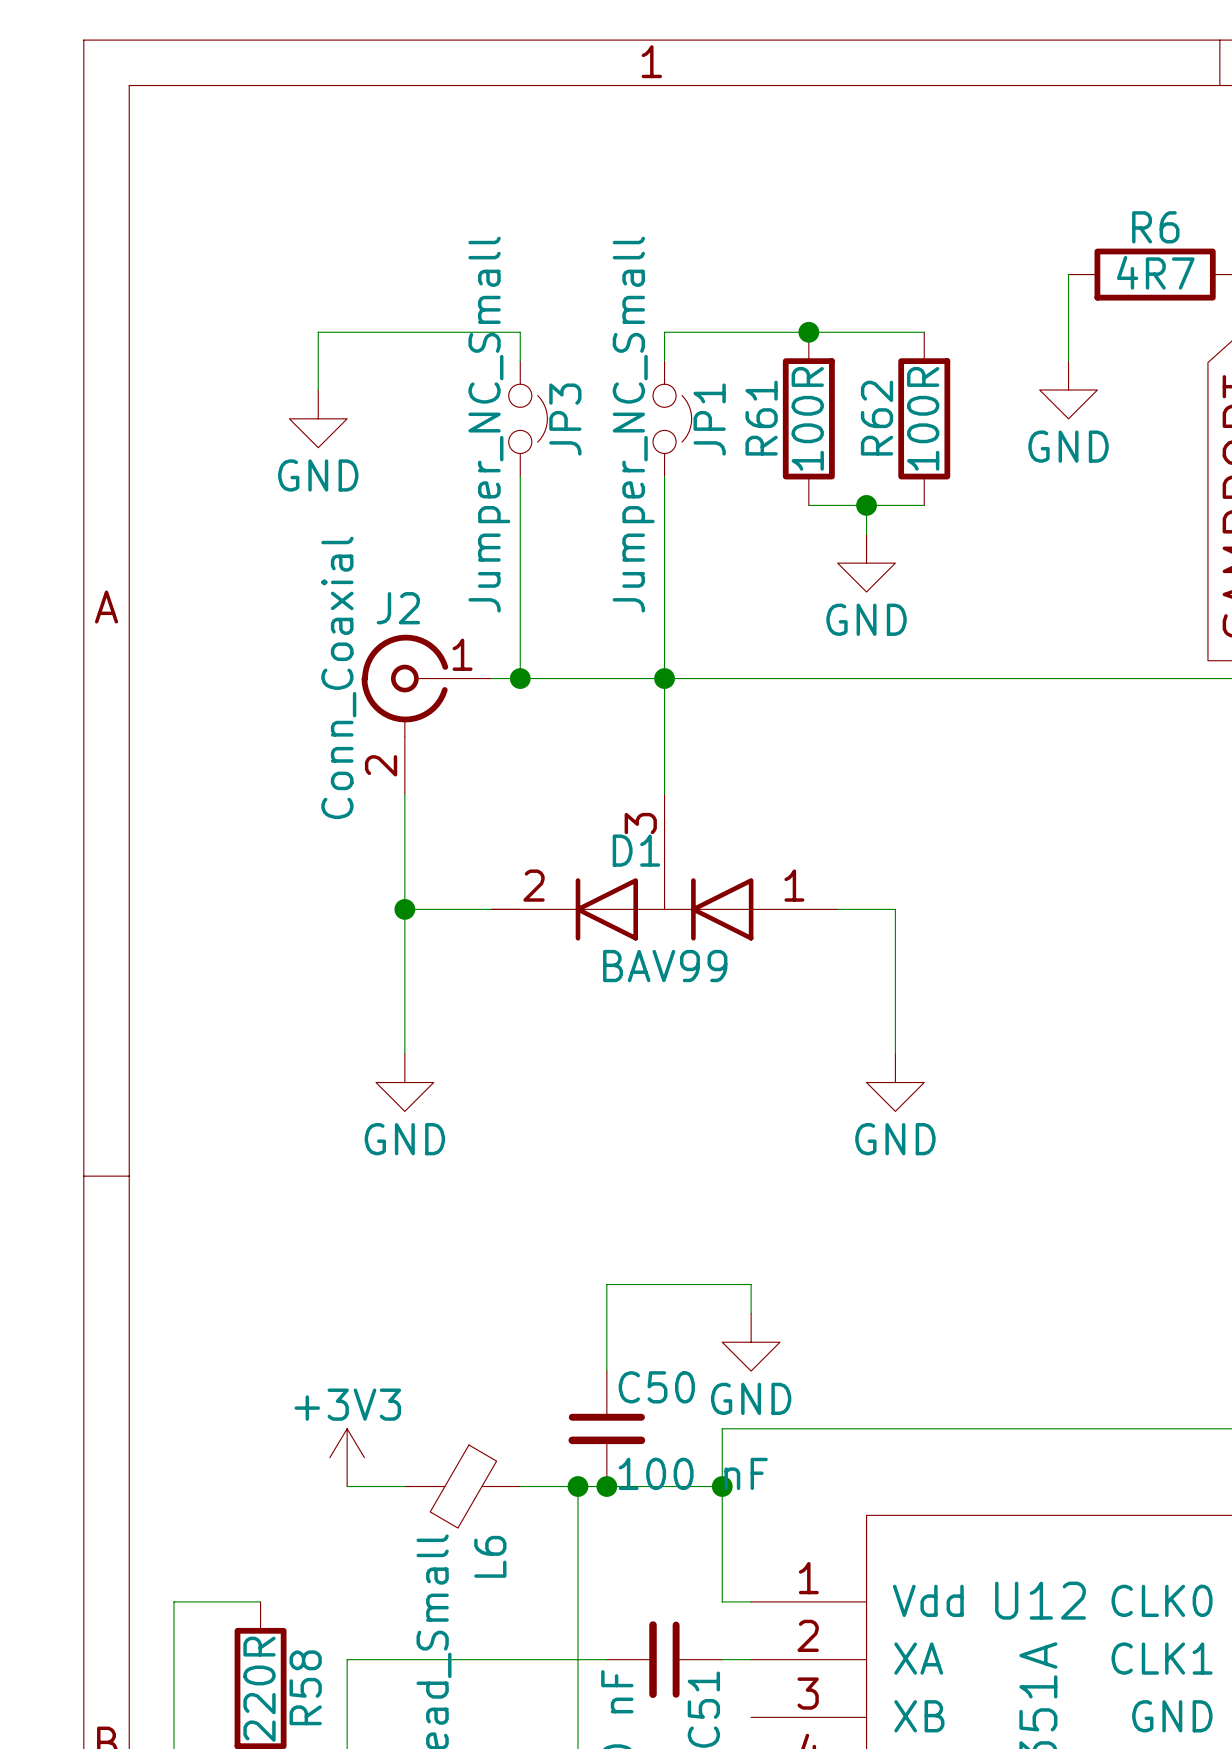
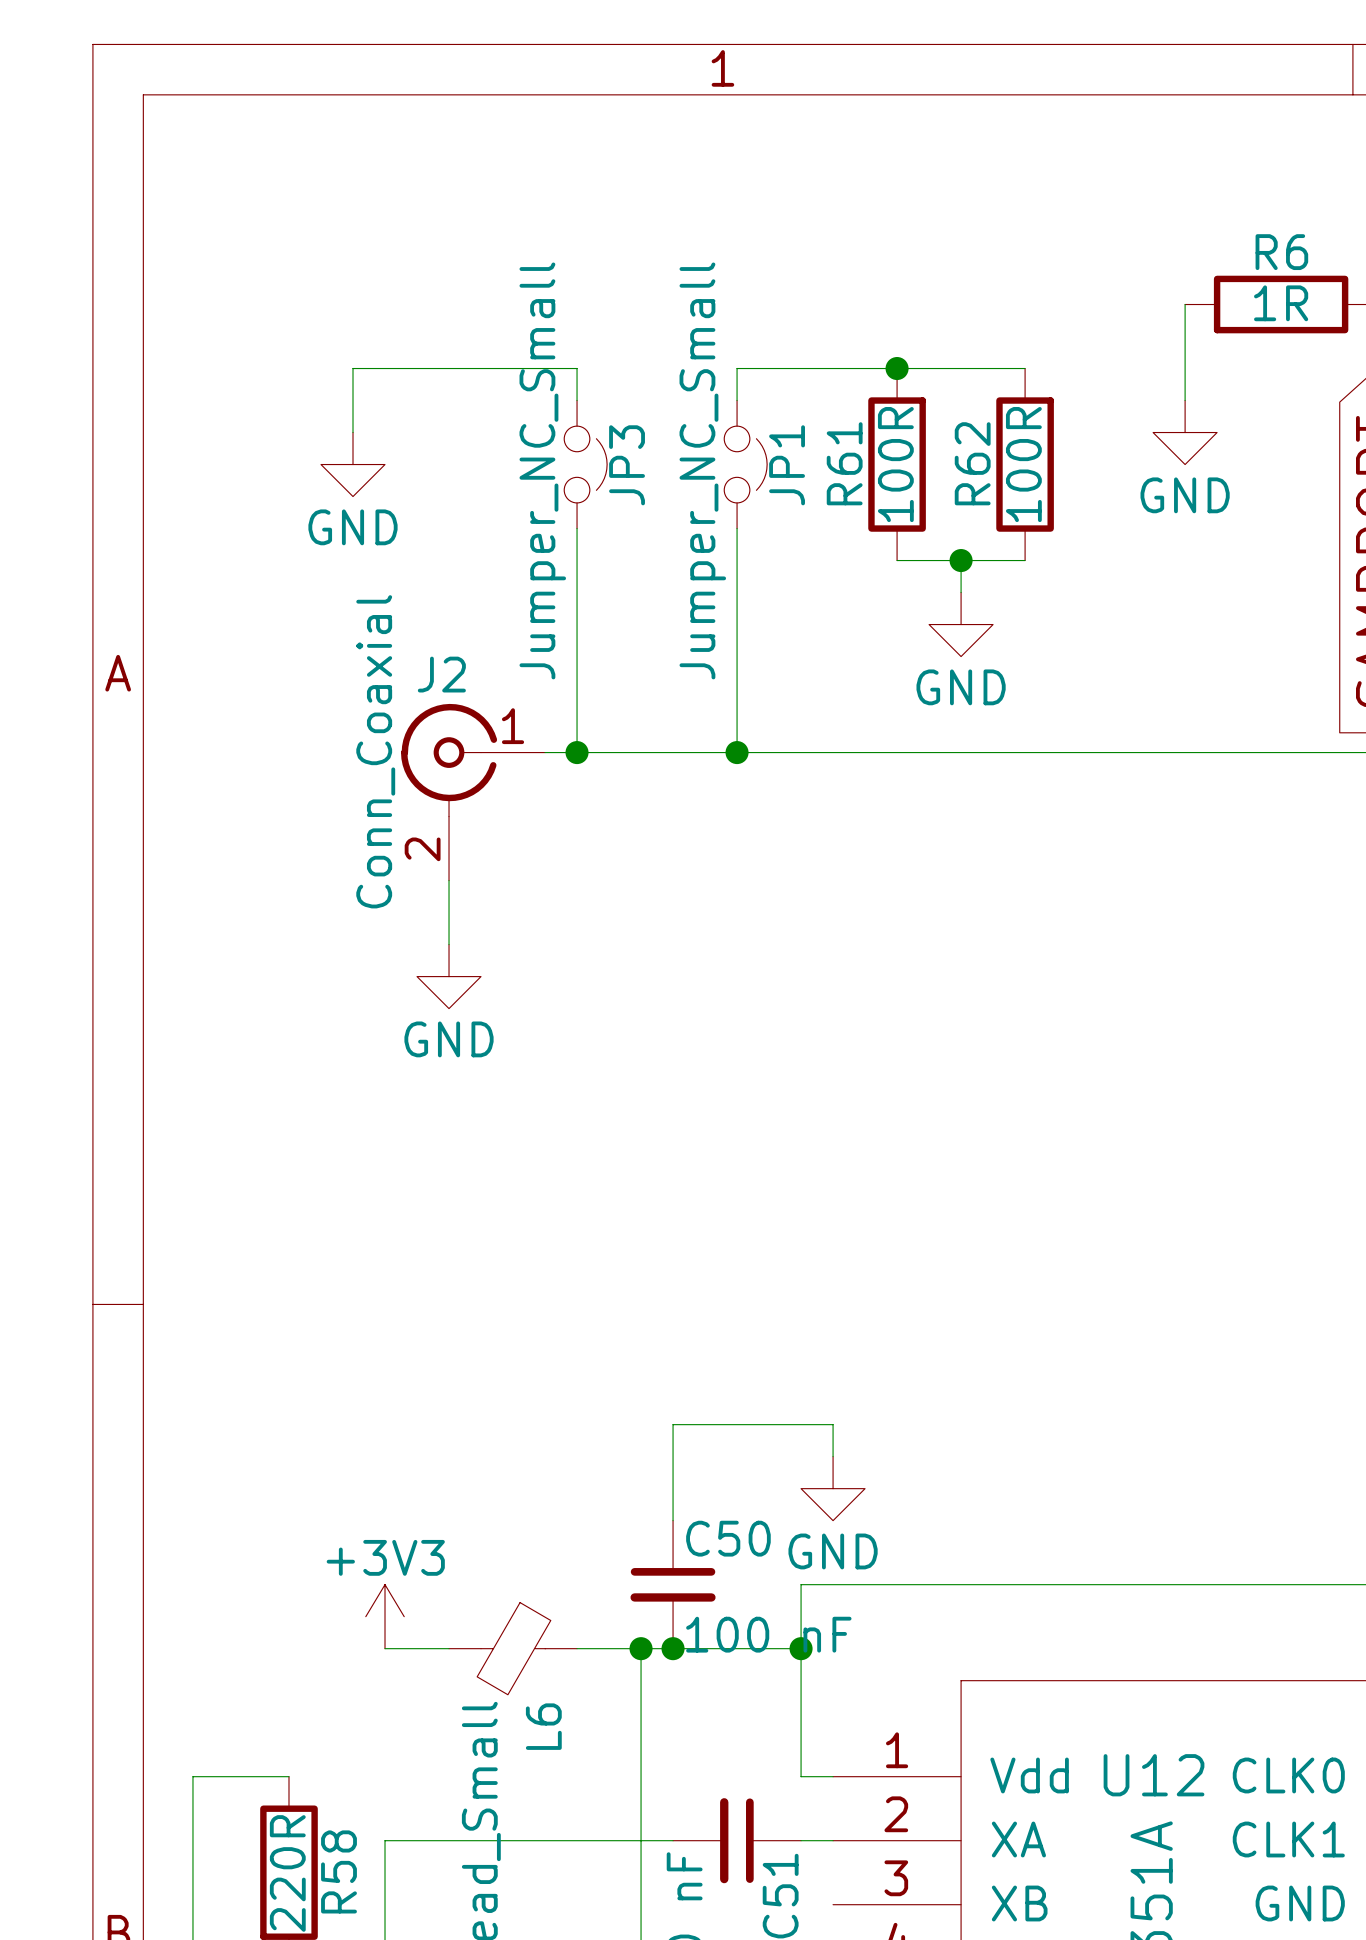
R6 value: 4R7 (1155, 272) -> 1R (1281, 303)
wire: (664, 678) (664, 793) -> none
wire: (404, 851) (404, 1053) -> none
D1: BAV99 (664, 867) -> none
wire: (404, 909) (491, 909) -> none
junction: (404, 909) -> none
wire: (837, 909) (895, 909) (895, 1053) -> none
power symbol position: GND (404, 1082) -> GND (449, 976)
power symbol: GND (895, 1082) -> none

